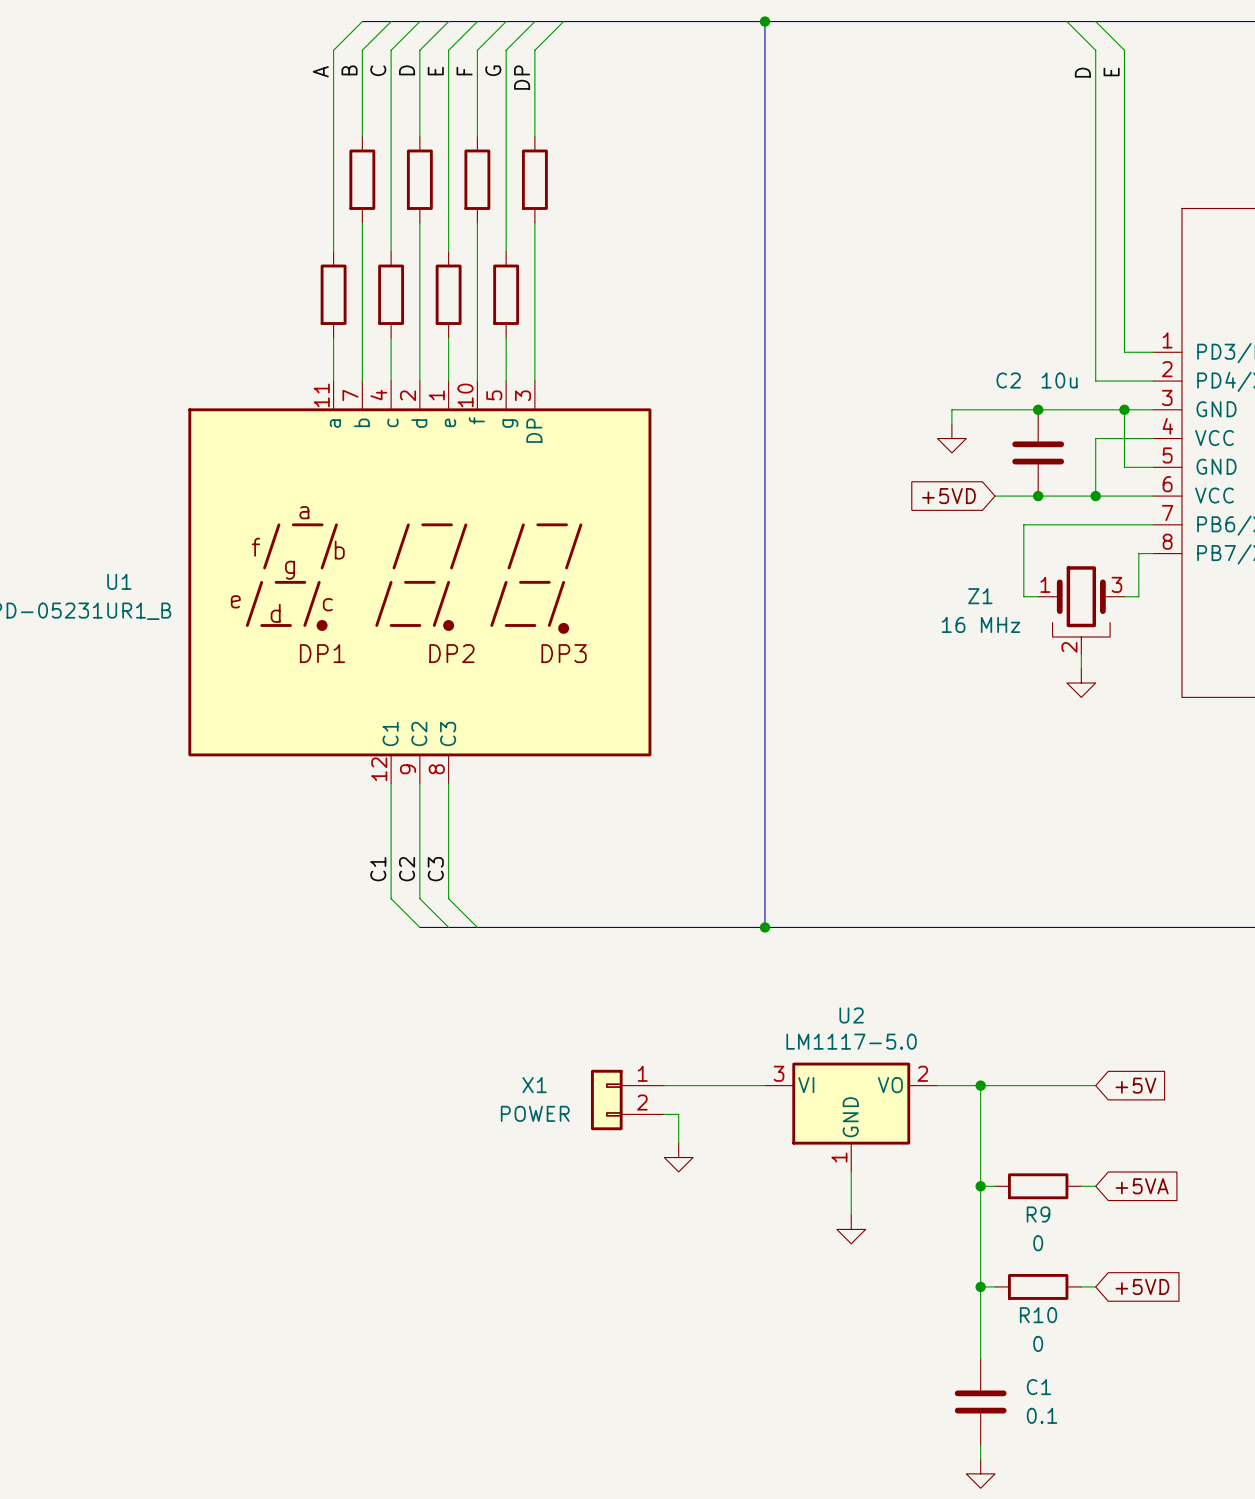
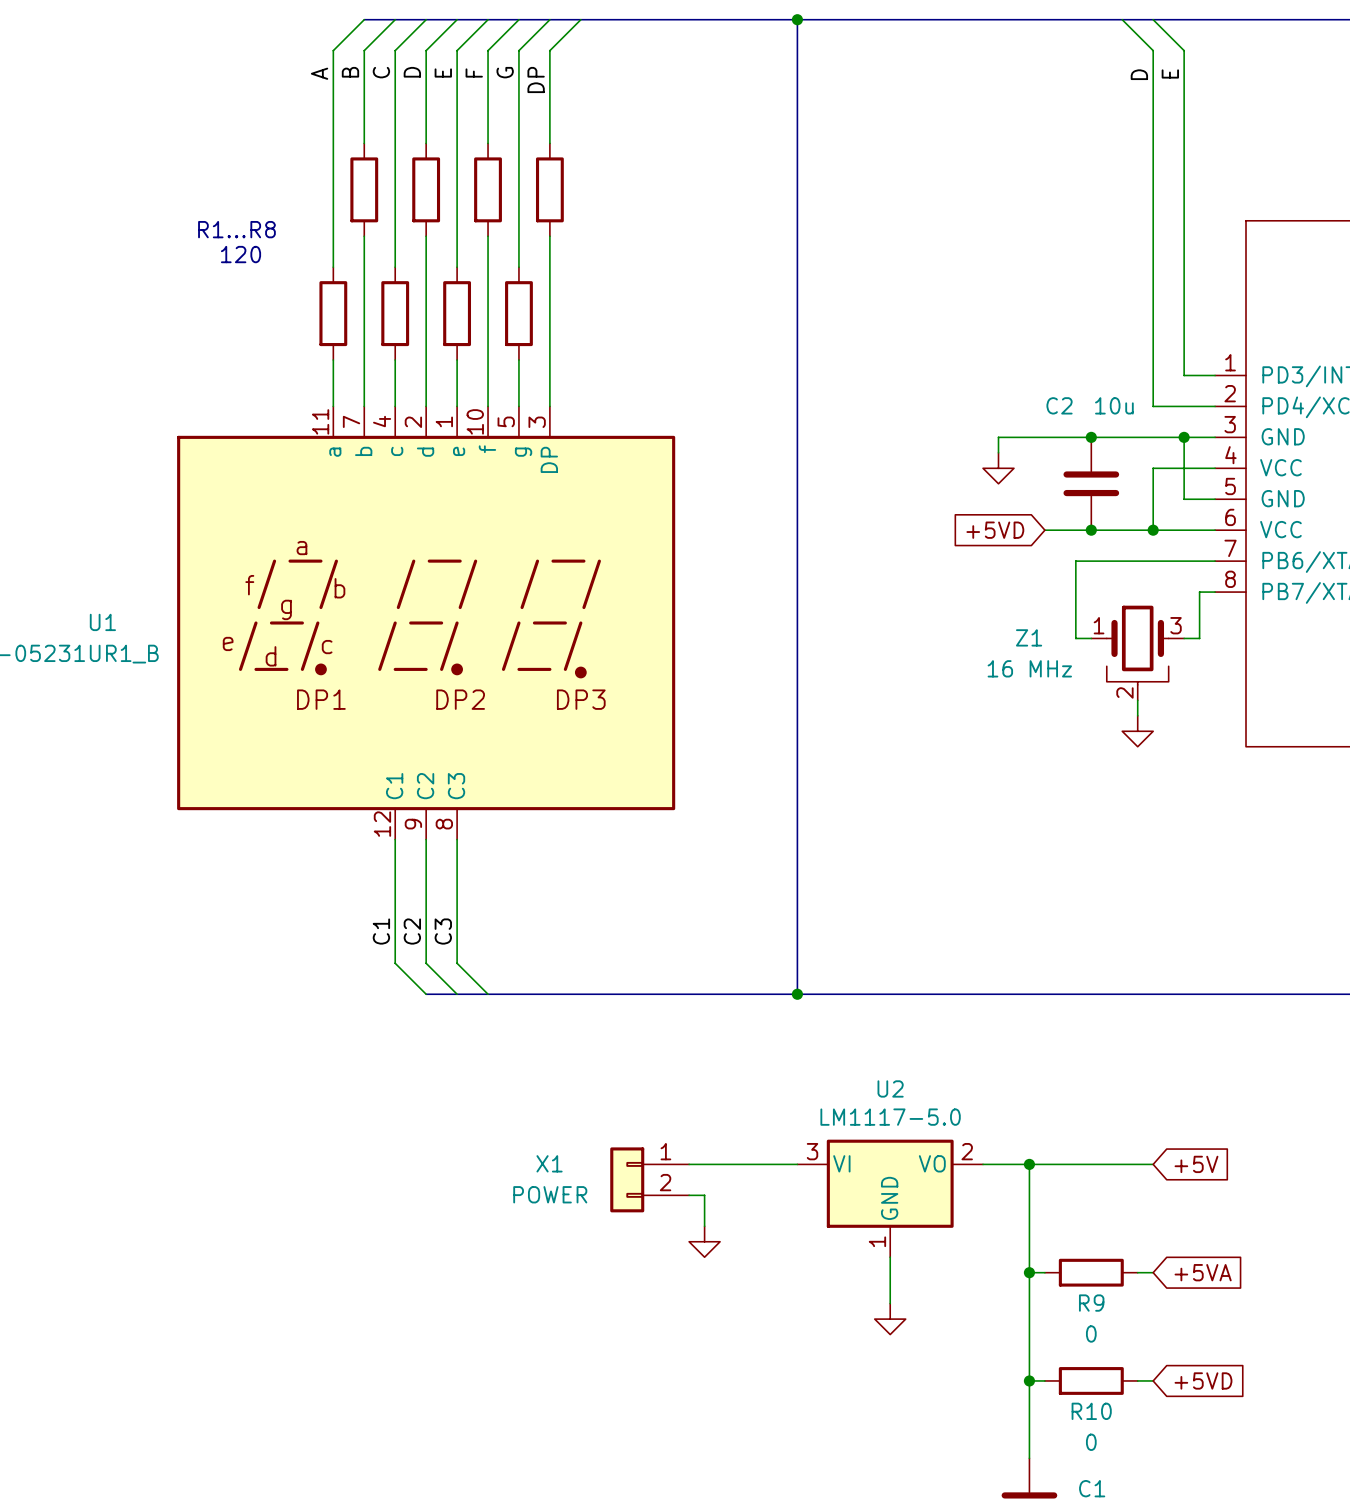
text: none -> R1...R8 (236, 229)
text: none -> 120 (241, 254)

